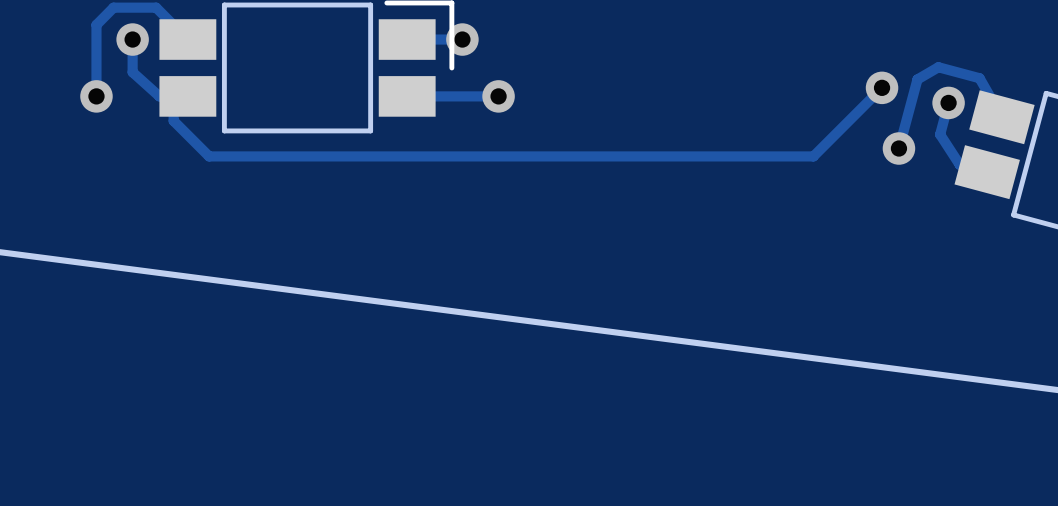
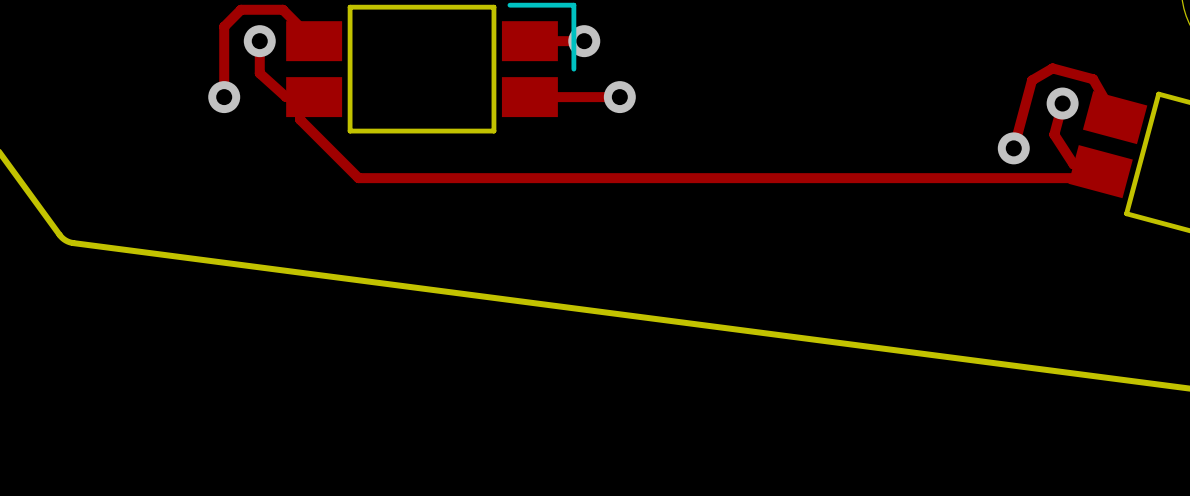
track: (882, 87) (813, 156) (209, 156) (173, 119) -> (1098, 171) (1091, 178) (358, 178) (300, 119)
via: (882, 87) -> none

